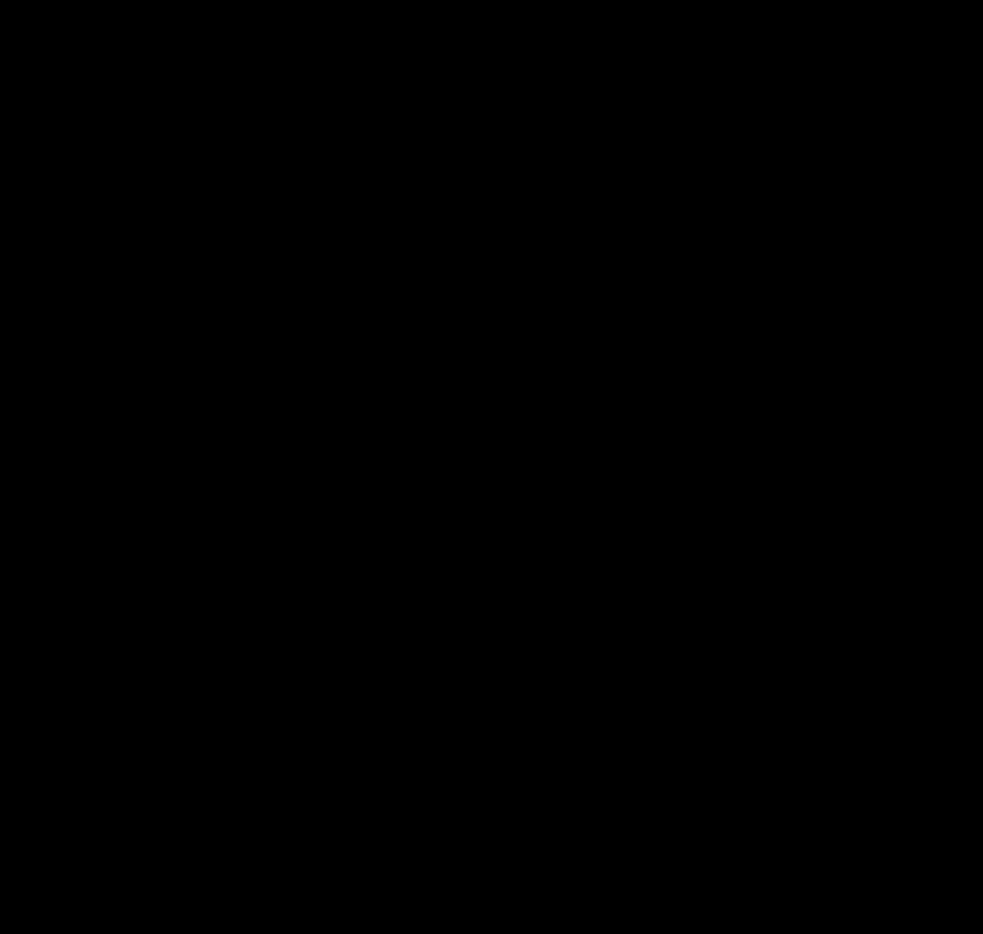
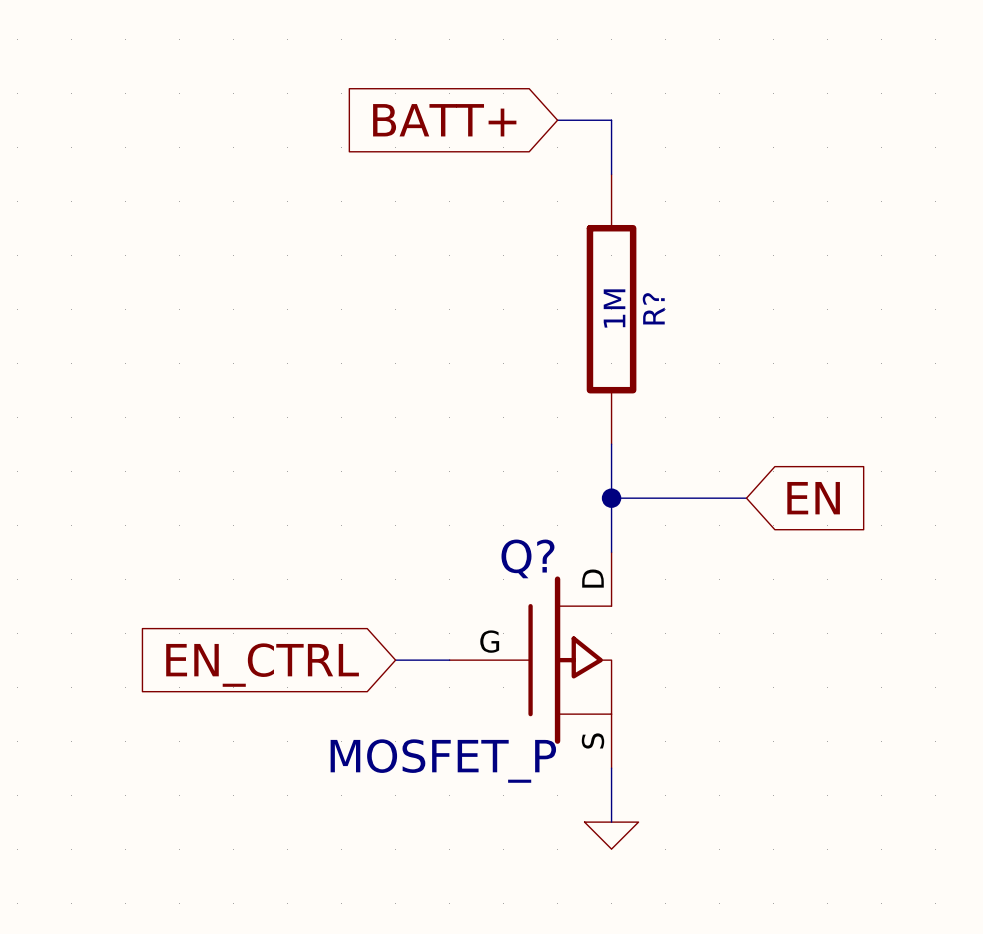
global label: none -> BATT+ (444, 120)
wire: none -> (557, 120) (611, 120) (611, 174)
R?: none -> 1M (611, 309)
wire: none -> (611, 444) (611, 552)
wire: none -> (611, 498) (746, 498)
junction: none -> (611, 498)
global label: none -> EN (813, 498)
wire: none -> (395, 660) (449, 660)
Q?: none -> MOSFET_P (530, 660)
global label: none -> EN_CTRL (262, 665)
wire: none -> (611, 768) (611, 822)
power symbol: none -> (611, 835)

